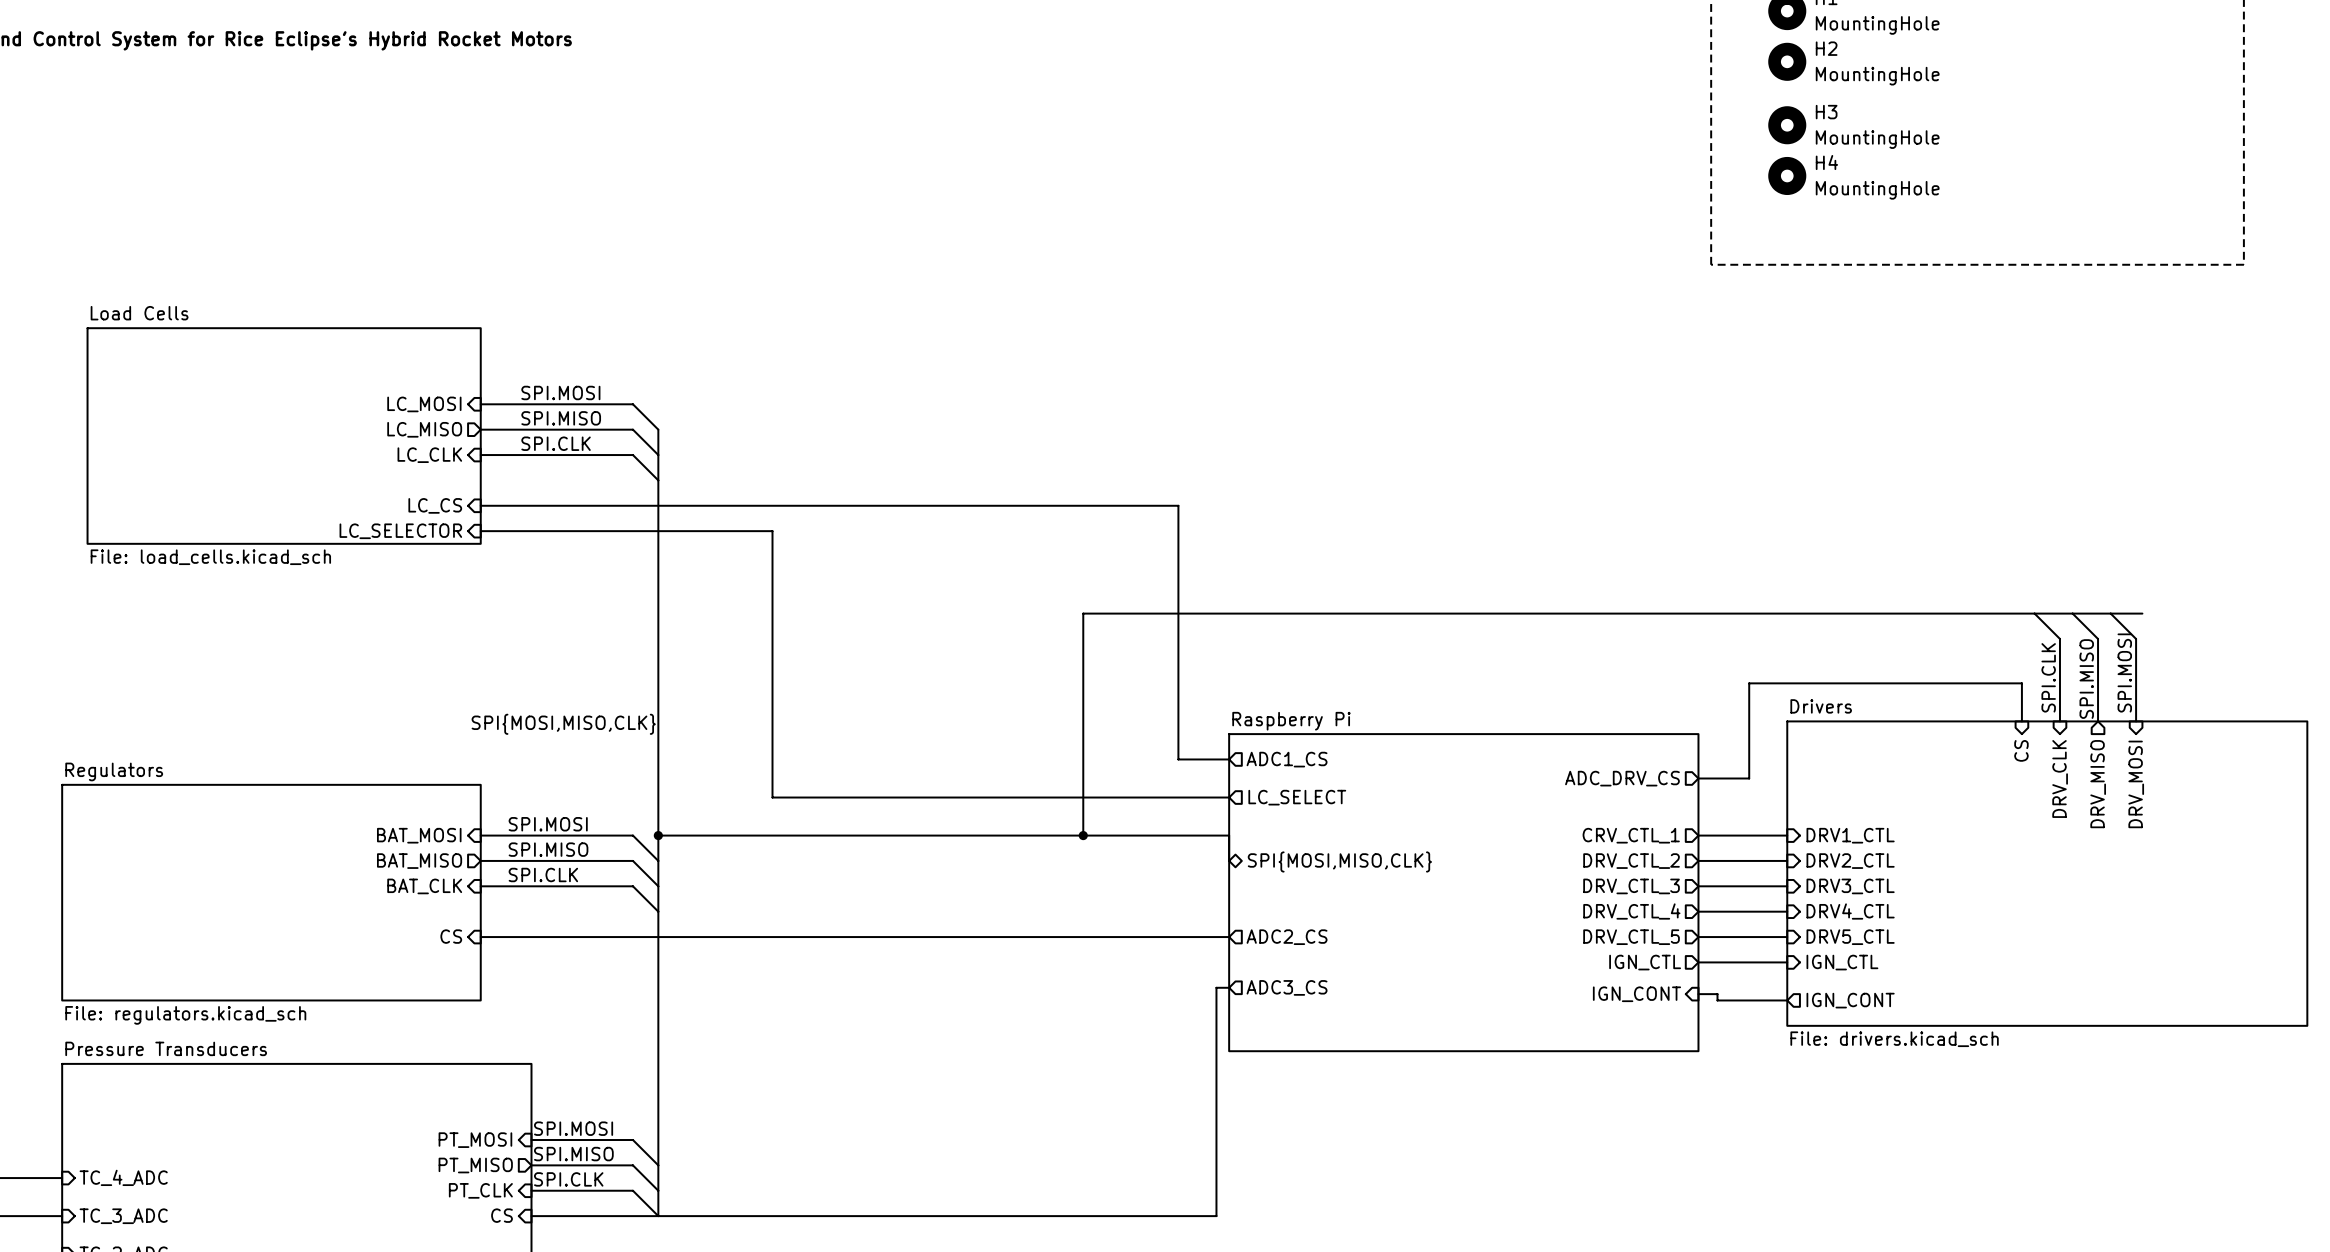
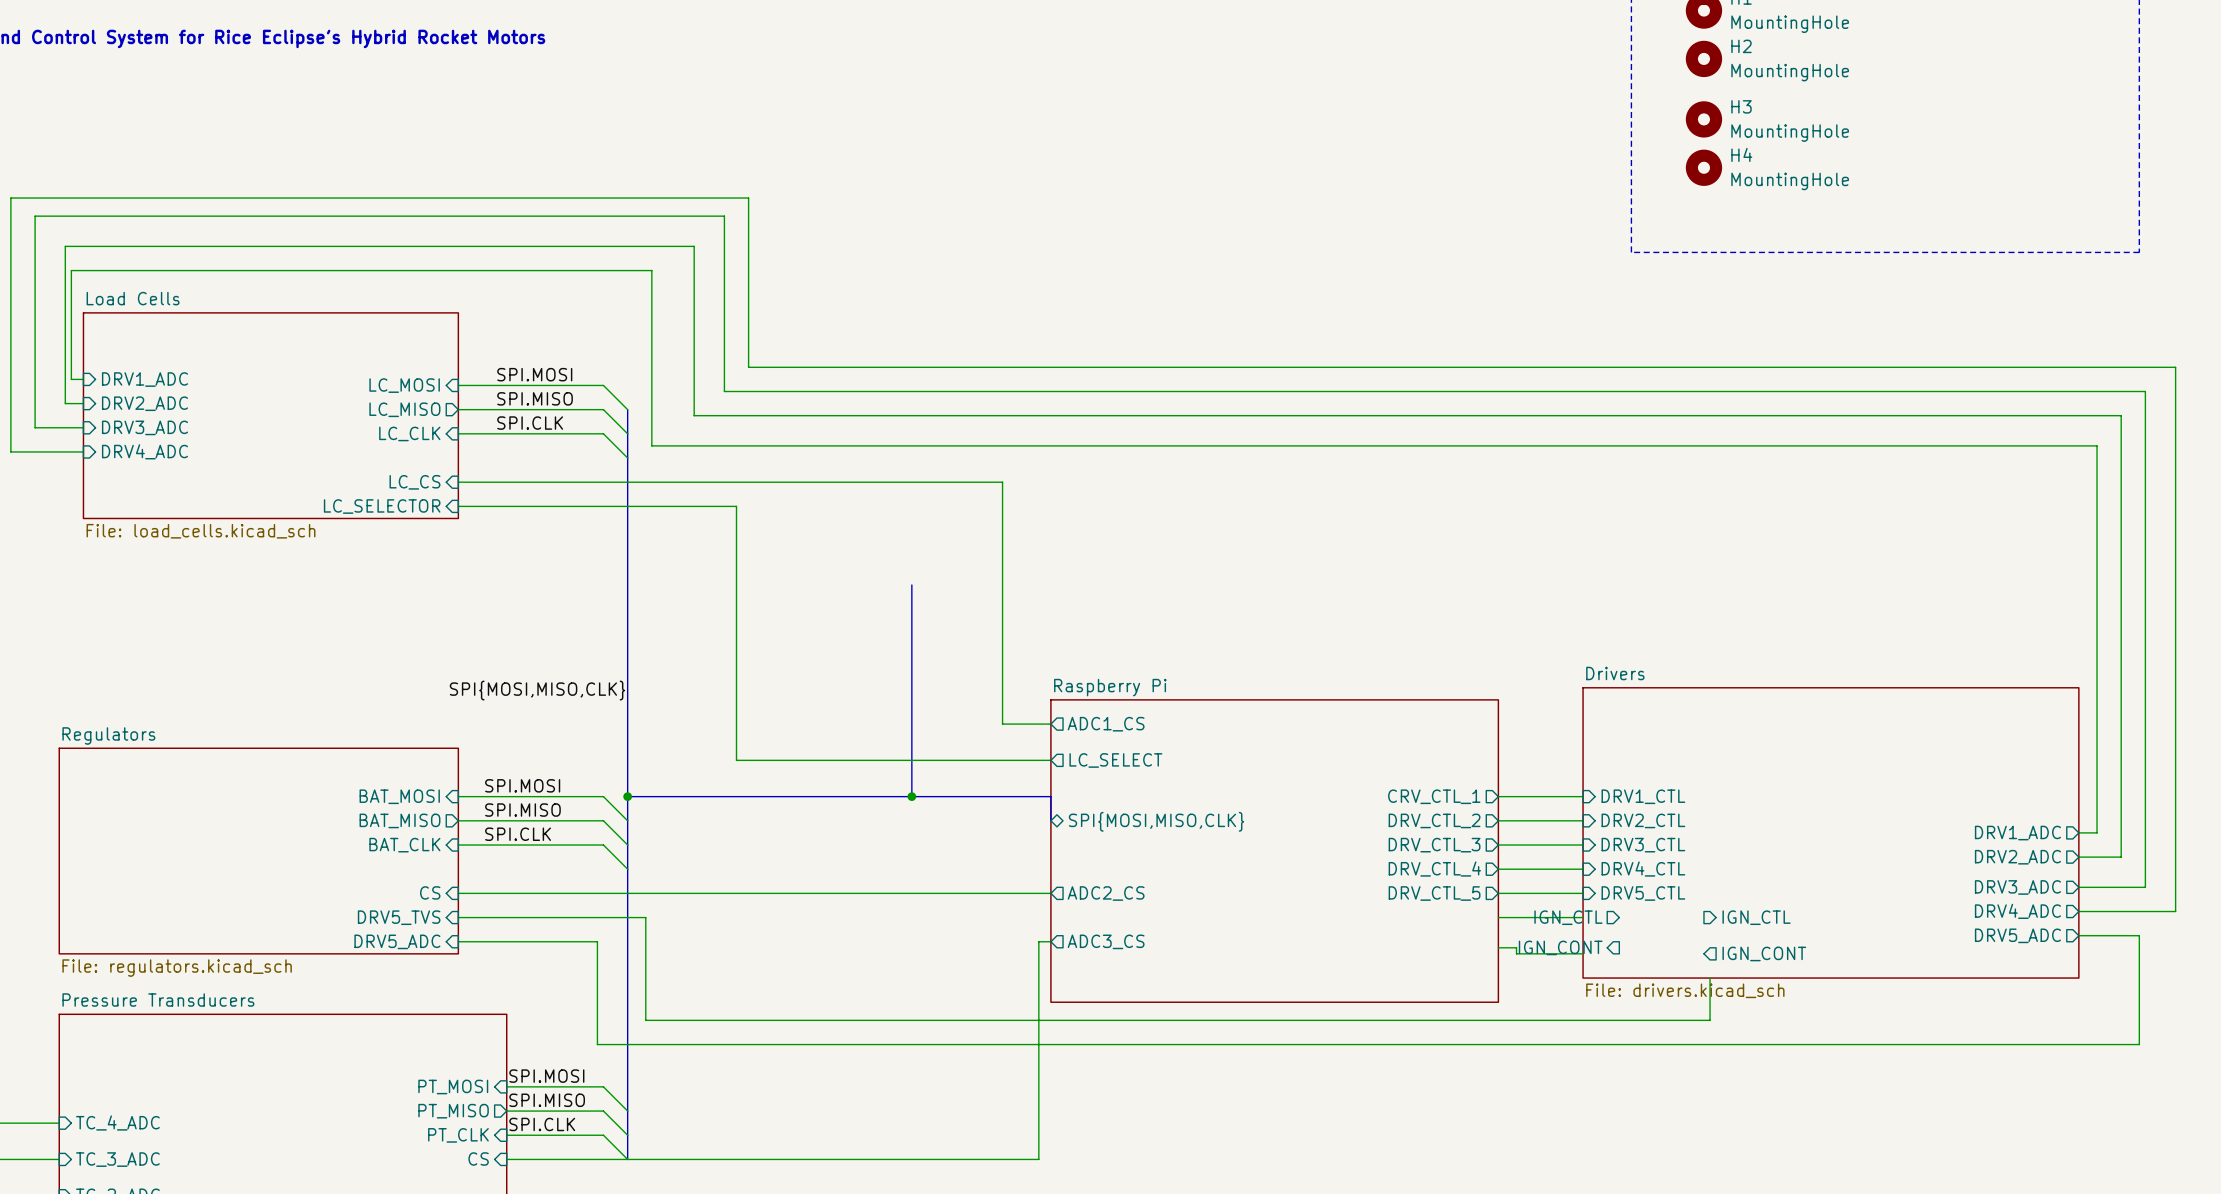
wire: none -> (83, 379) (71, 379) (71, 270) (651, 270) (651, 445) (2097, 445) (2097, 832) (2078, 832)
sheet pin: none -> DRV1_ADC (144, 379)
wire: none -> (83, 403) (65, 403) (65, 246) (694, 246) (694, 415) (2121, 415) (2121, 857) (2078, 857)
sheet pin: none -> DRV2_ADC (144, 403)
wire: none -> (83, 427) (35, 427) (35, 216) (724, 216) (724, 391) (2145, 391) (2145, 887) (2078, 887)
sheet pin: none -> DRV3_ADC (144, 427)
sheet pin: none -> DRV4_ADC (144, 451)
wire: none -> (83, 451) (10, 451) (10, 198) (748, 198) (748, 367) (2175, 367) (2175, 911) (2078, 911)
wire: (1051, 505) (1178, 505) (1178, 759) (1229, 759) -> (1002, 482) (1002, 724) (1050, 724)
bus: none -> (911, 585) (911, 796)
wire: (2034, 613) (2059, 638) (2059, 721) -> none
wire: (2072, 613) (2098, 638) -> none
wire: (2110, 613) (2136, 638) -> none
bus: (2142, 613) (1083, 613) (1083, 835) -> none
wire: (2098, 638) (2098, 721) -> none
wire: (2136, 638) (2136, 721) -> none
label: SPI.MOSI (2124, 672) -> none
label: SPI.CLK (2048, 677) -> none
label: SPI.MISO (2086, 679) -> none
wire: (2021, 721) (2021, 683) (1749, 683) (1749, 778) (1698, 778) -> none
sheet pin: CS (2021, 750) -> none
sheet pin position: ADC1_CS (1287, 759) -> ADC1_CS (1106, 724)
sheet pin: ADC_DRV_CS (1622, 778) -> none
sheet pin: DRV_CLK (2060, 778) -> none
sheet pin: DRV_MISO (2098, 784) -> none
sheet pin: DRV_MOSI (2136, 784) -> none
wire: (1102, 797) (1229, 797) -> none
sheet pin position: LC_SELECT (1297, 797) -> LC_SELECT (1115, 760)
junction: none -> (911, 796)
junction: (1083, 835) -> none
bus: (1102, 835) (1229, 835) (1229, 860) -> (1050, 796) (1050, 820)
sheet pin position: CRV_CTL_1 (1631, 835) -> CRV_CTL_1 (1434, 796)
wire: (1698, 835) (1787, 835) -> (1498, 796) (1583, 796)
sheet pin position: DRV1_CTL (1850, 835) -> DRV1_CTL (1643, 796)
wire: (1698, 860) (1787, 860) -> (1498, 820) (1583, 820)
sheet pin position: SPI{MOSI,MISO,CLK} (1339, 861) -> SPI{MOSI,MISO,CLK} (1156, 821)
sheet pin position: DRV_CTL_2 (1631, 861) -> DRV_CTL_2 (1434, 820)
sheet pin position: DRV2_CTL (1850, 861) -> DRV2_CTL (1643, 820)
sheet Drivers position: (2047, 873) -> (1830, 832)
sheet pin: none -> DRV1_ADC (2017, 833)
sheet pin position: DRV_CTL_3 (1631, 886) -> DRV_CTL_3 (1434, 845)
wire: (1698, 886) (1787, 886) -> (1498, 845) (1583, 845)
sheet pin position: DRV3_CTL (1850, 886) -> DRV3_CTL (1643, 845)
sheet Raspberry Pi position: (1463, 892) -> (1274, 851)
sheet pin: none -> DRV2_ADC (2017, 857)
sheet pin position: DRV_CTL_4 (1631, 911) -> DRV_CTL_4 (1434, 869)
wire: (1698, 911) (1787, 911) -> (1498, 869) (1583, 869)
sheet pin position: DRV4_CTL (1850, 911) -> DRV4_CTL (1643, 869)
sheet pin: none -> DRV3_ADC (2017, 887)
wire: (1102, 937) (1229, 937) -> none
sheet pin position: ADC2_CS (1287, 937) -> ADC2_CS (1106, 893)
sheet pin position: DRV_CTL_5 (1631, 937) -> DRV_CTL_5 (1434, 893)
wire: (1698, 937) (1787, 937) -> (1498, 893) (1583, 893)
sheet pin position: DRV5_CTL (1850, 937) -> DRV5_CTL (1643, 893)
sheet pin: none -> DRV4_ADC (2017, 911)
sheet pin: none -> DRV5_TVS (399, 917)
wire: none -> (458, 917) (645, 917) (645, 1020) (1710, 1020) (1710, 978)
wire: (1698, 962) (1787, 962) -> (1498, 917) (1583, 917)
sheet pin: none -> DRV5_ADC (2017, 935)
wire: none -> (2078, 935) (2139, 935) (2139, 1044) (597, 1044) (597, 941) (458, 941)
sheet pin: none -> DRV5_ADC (397, 941)
wire: (1229, 987) (1216, 987) (1216, 1216) (1089, 1216) -> (1050, 941) (1038, 941) (1038, 1159)
sheet pin position: ADC3_CS (1287, 987) -> ADC3_CS (1106, 941)
wire: (1698, 994) (1717, 994) (1717, 1000) (1787, 1000) -> (1498, 947) (1516, 947) (1516, 953) (1583, 953)

